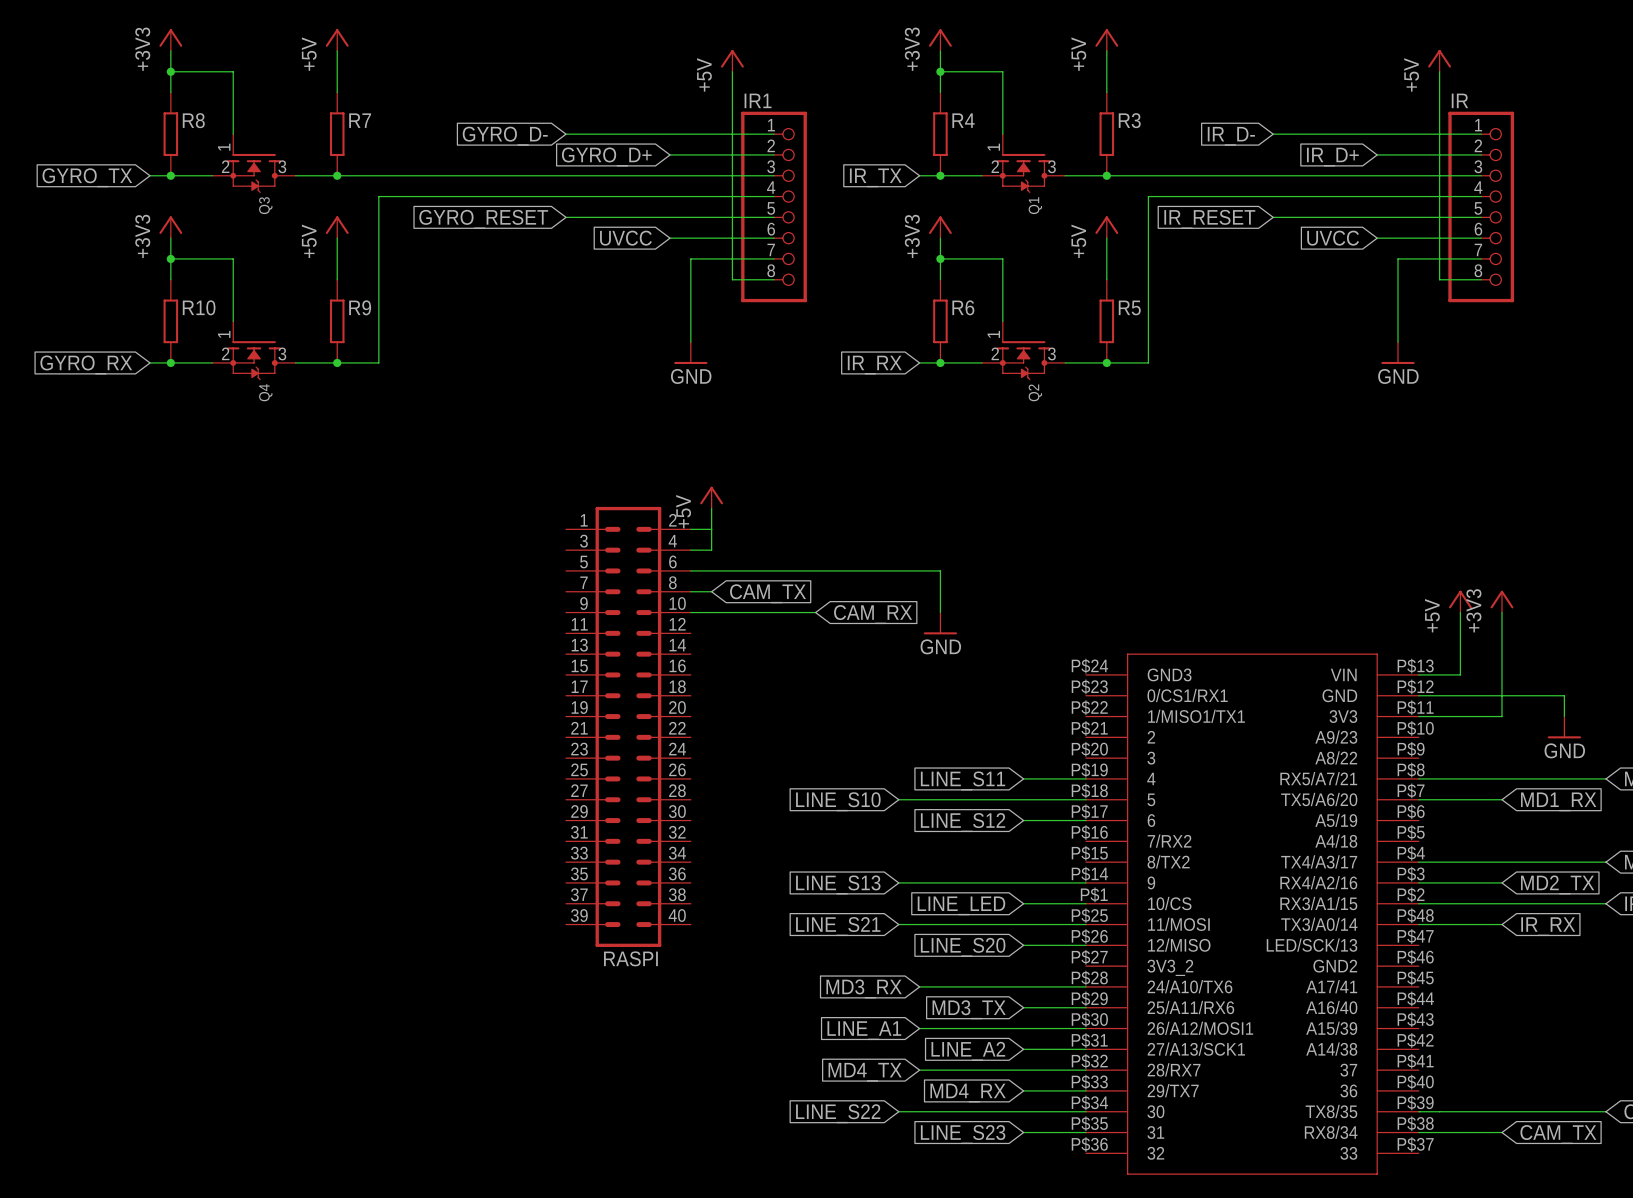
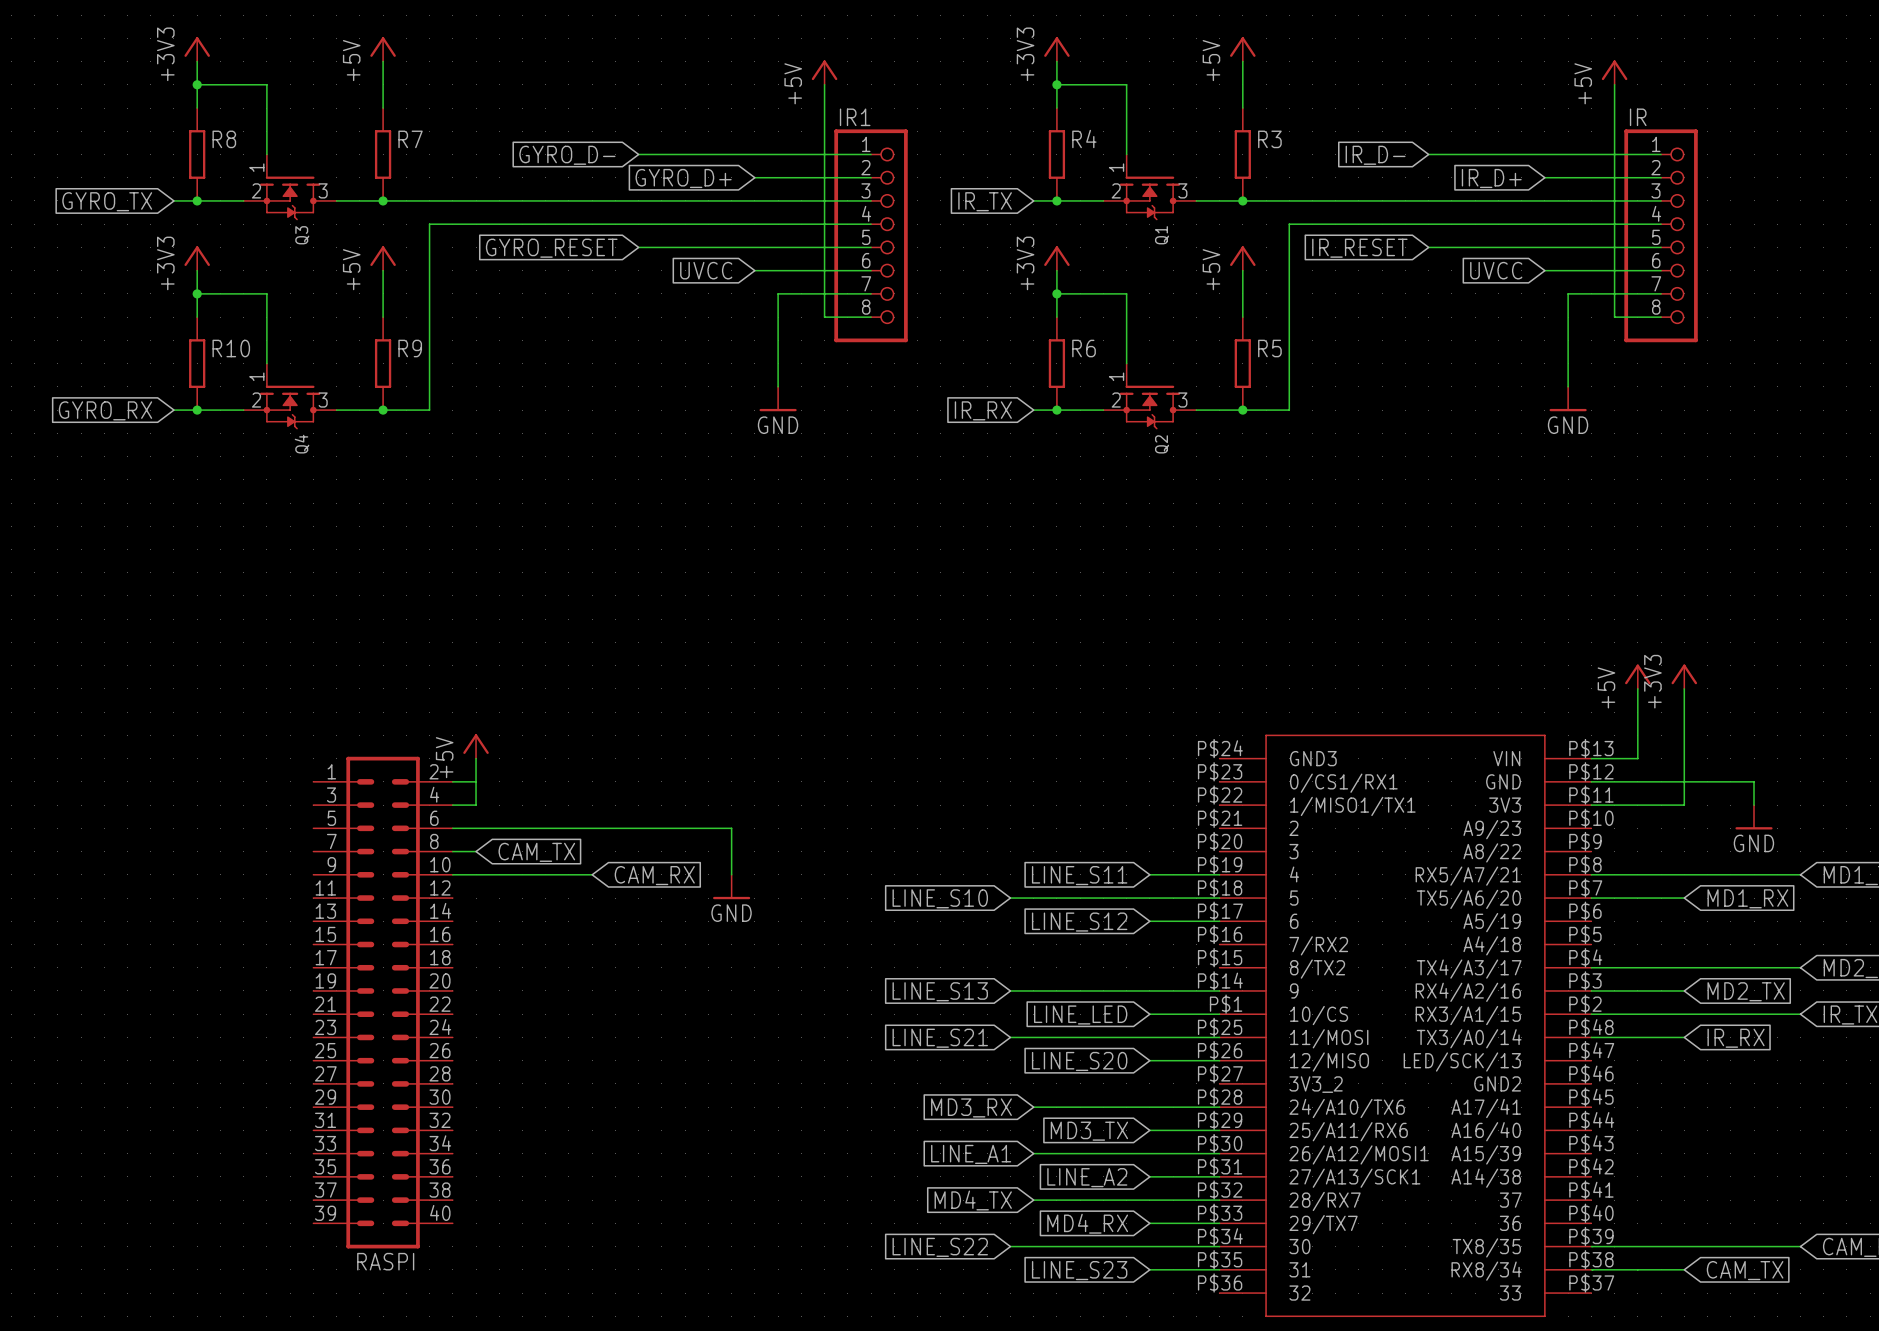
power symbol: +5V (711, 497) -> none
wire: (711, 508) (711, 550) (690, 550) -> none
wire: (690, 529) (711, 529) -> none
wire: (690, 570) (940, 570) (940, 612) -> none
wire: (690, 591) (711, 591) -> none
global label: CAM_TX (768, 593) -> none
wire: (690, 612) (815, 612) -> none
global label: CAM_RX (873, 614) -> none
power symbol: GND (940, 623) -> none
power symbol: none -> +5V (476, 746)
wire: none -> (476, 758) (476, 805) (452, 805)
wire: none -> (452, 781) (476, 781)
RASPI: (628, 726) -> none
wire: none -> (452, 828) (731, 828) (731, 874)
wire: none -> (452, 851) (476, 851)
global label: none -> CAM_TX (536, 852)
wire: none -> (452, 874) (592, 874)
global label: none -> CAM_RX (654, 875)
power symbol: none -> GND (731, 887)
RASPI: none -> (383, 1002)

